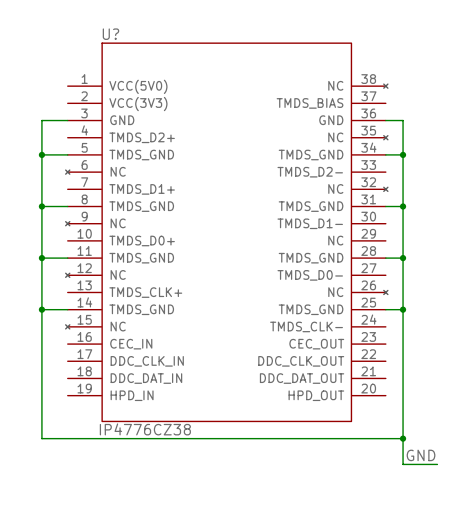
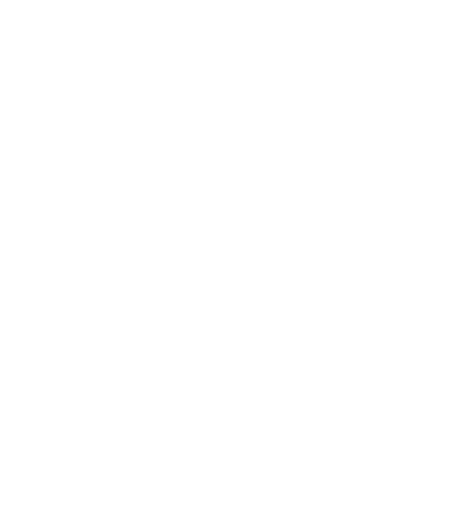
wire: (67, 120) (41, 120) (41, 438) (403, 438) -> none
wire: (385, 120) (403, 120) (403, 464) (437, 464) -> none
wire: (41, 154) (67, 154) -> none
junction: (41, 154) -> none
wire: (385, 154) (403, 154) -> none
junction: (403, 154) -> none
wire: (41, 206) (67, 206) -> none
junction: (41, 206) -> none
wire: (385, 206) (403, 206) -> none
junction: (403, 206) -> none
U?: IP4776CZ38 (226, 232) -> none
wire: (41, 258) (67, 258) -> none
junction: (41, 258) -> none
wire: (385, 258) (403, 258) -> none
junction: (403, 258) -> none
wire: (41, 309) (67, 309) -> none
junction: (41, 309) -> none
wire: (385, 309) (403, 309) -> none
junction: (403, 309) -> none
junction: (403, 438) -> none
label: GND (421, 455) -> none

